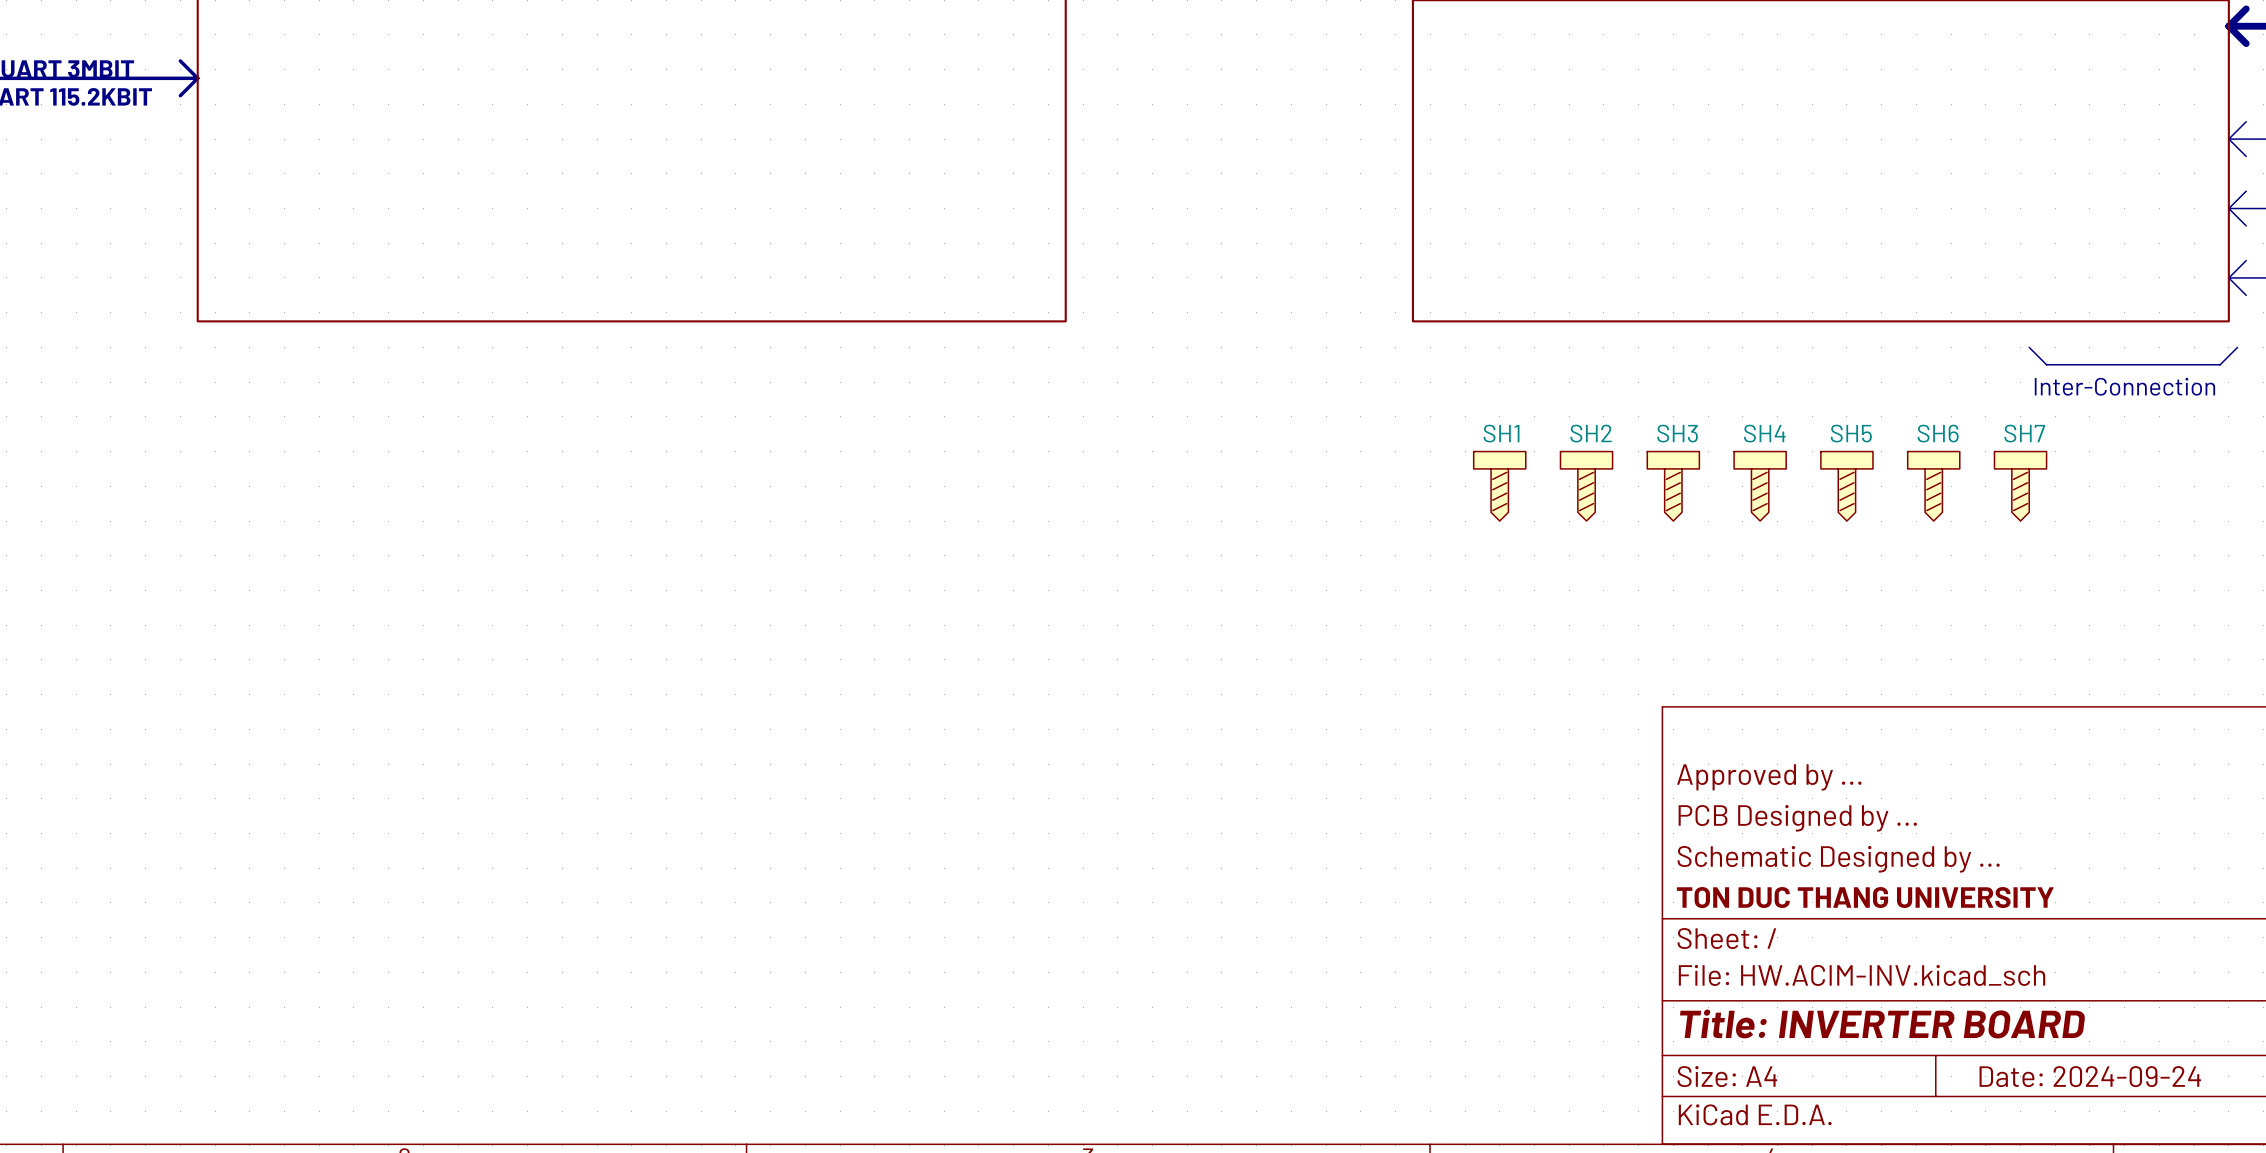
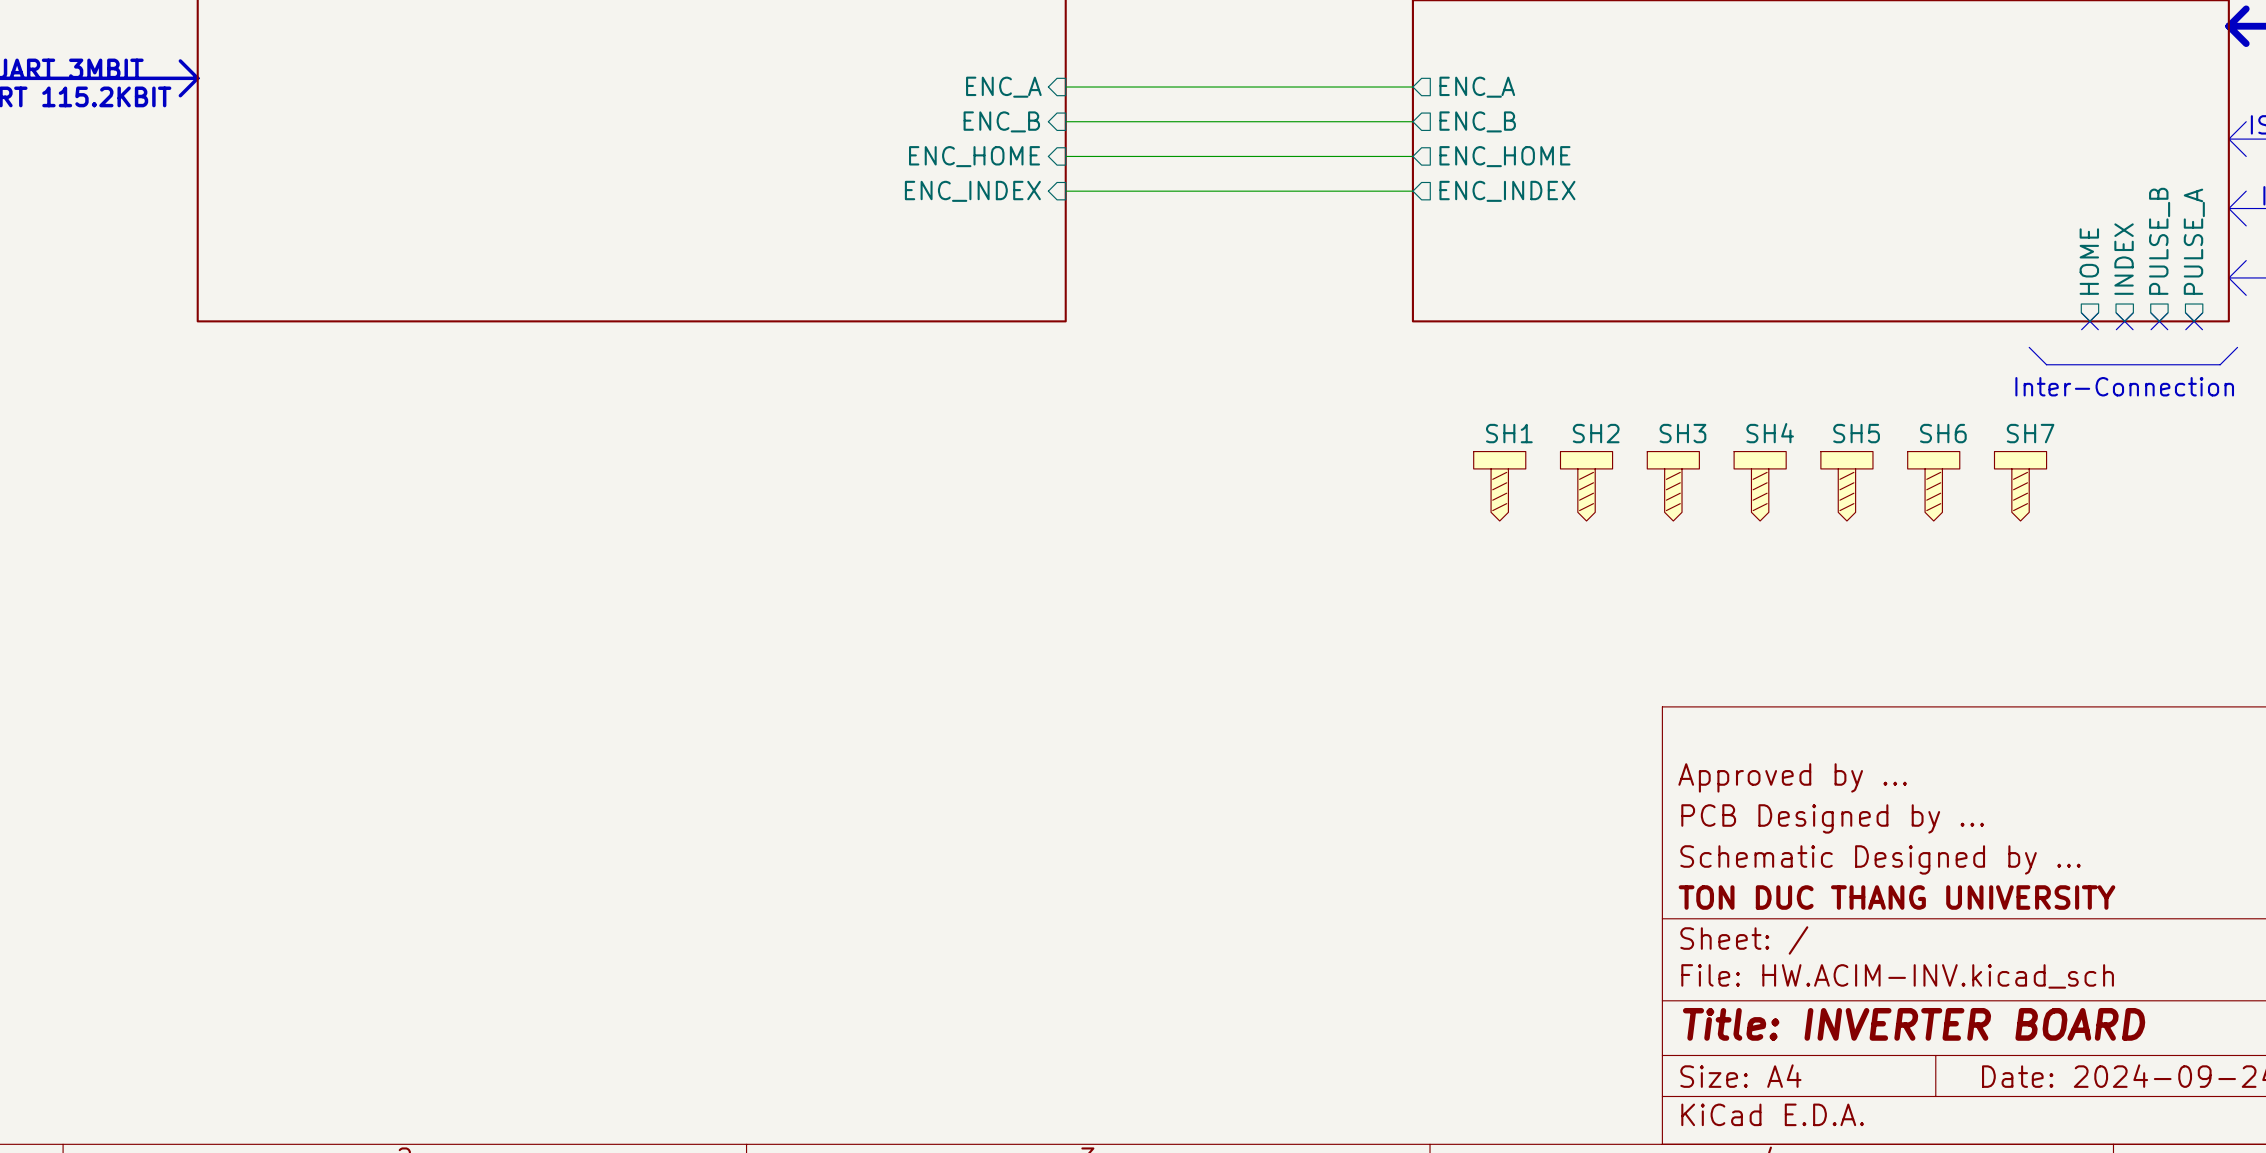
sheet pin: none -> ENC_A (1003, 87)
sheet pin: none -> ENC_A (1477, 87)
wire: none -> (1065, 87) (1412, 87)
sheet pin: none -> ENC_B (1001, 121)
wire: none -> (1065, 121) (1412, 121)
sheet pin: none -> ENC_B (1477, 121)
sheet pin: none -> ENC_HOME (974, 156)
sheet pin: none -> ENC_HOME (1504, 156)
wire: none -> (1065, 156) (1412, 156)
sheet pin: none -> ENC_INDEX (972, 191)
sheet pin: none -> ENC_INDEX (1507, 191)
wire: none -> (1065, 191) (1412, 191)
sheet pin: none -> PULSE_A (2194, 241)
sheet pin: none -> PULSE_B (2159, 241)
sheet pin: none -> INDEX (2124, 259)
sheet pin: none -> HOME (2089, 261)
no-connect mark: none -> (2089, 321)
no-connect mark: none -> (2124, 321)
no-connect mark: none -> (2159, 321)
no-connect mark: none -> (2194, 321)

